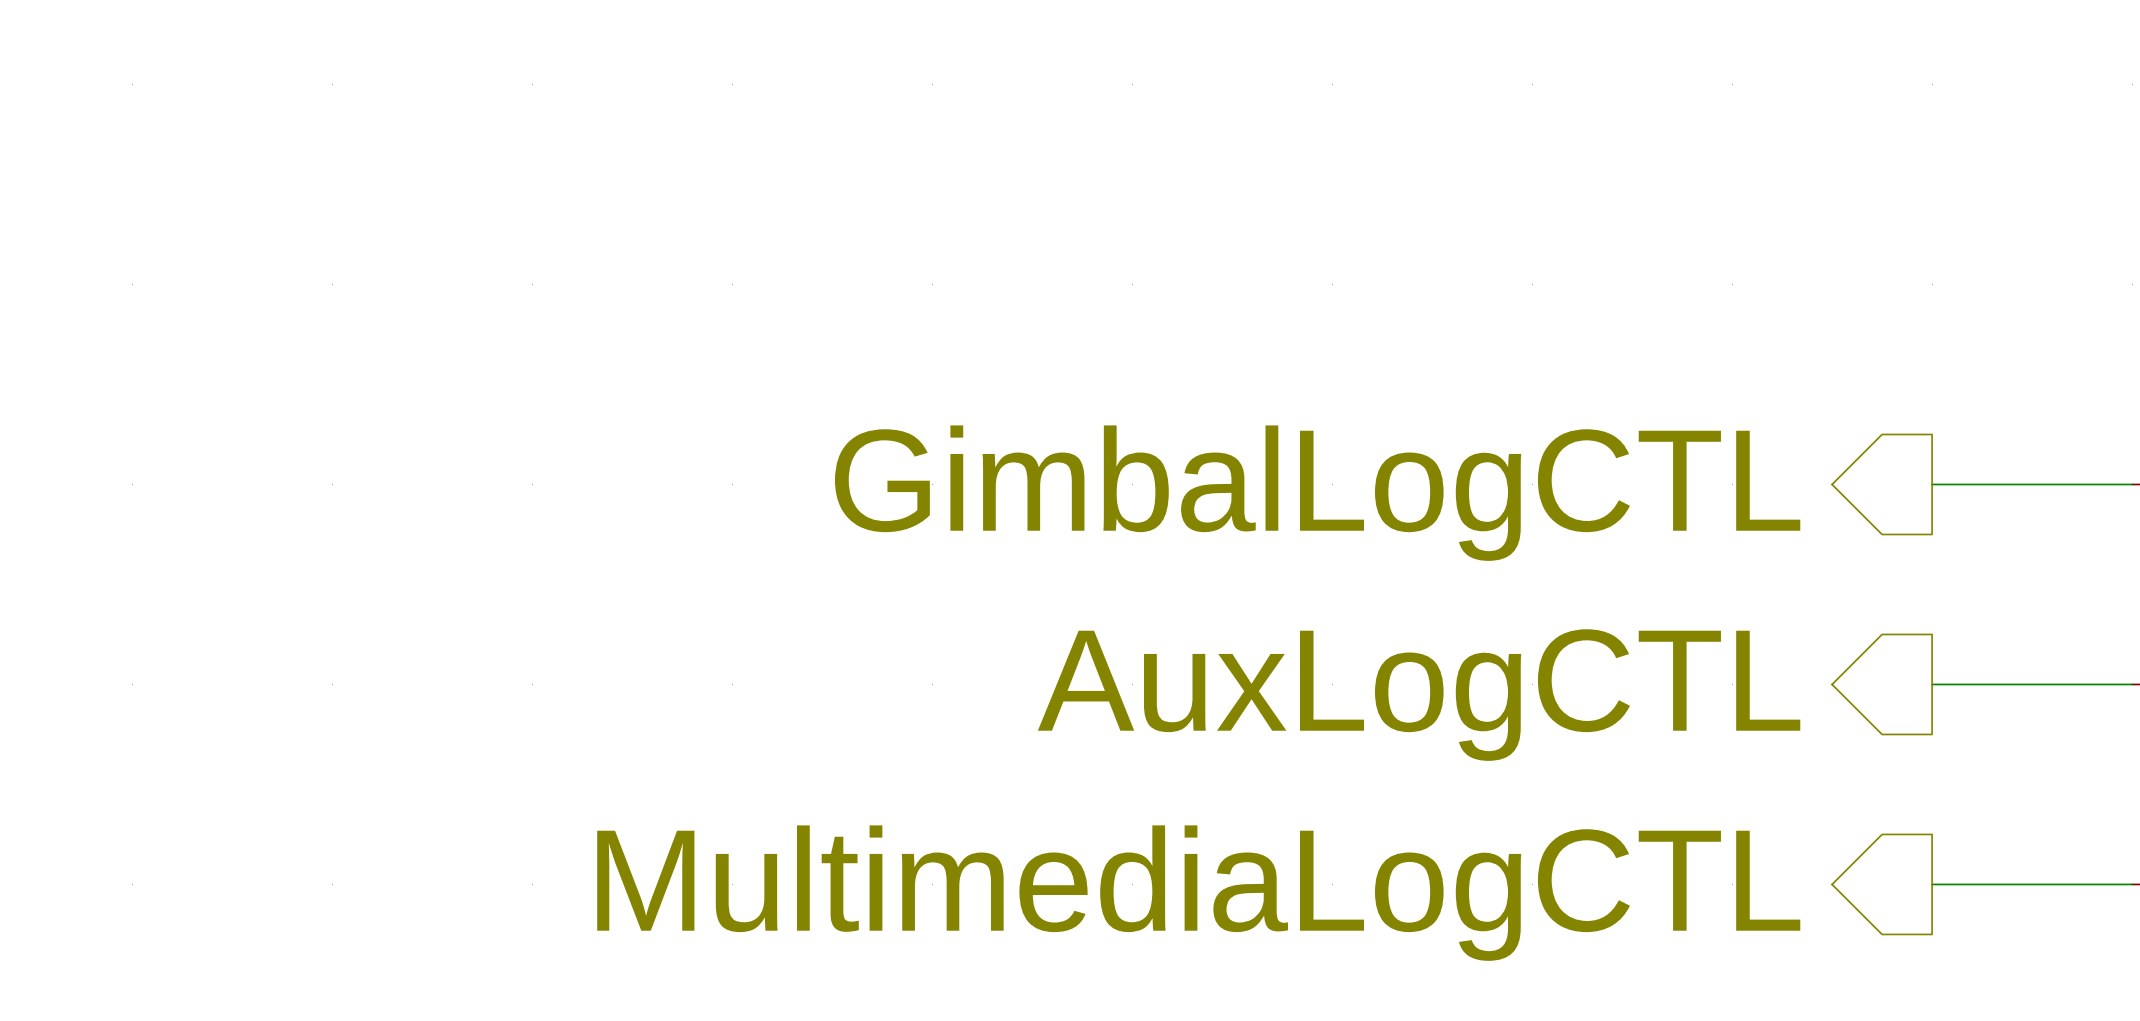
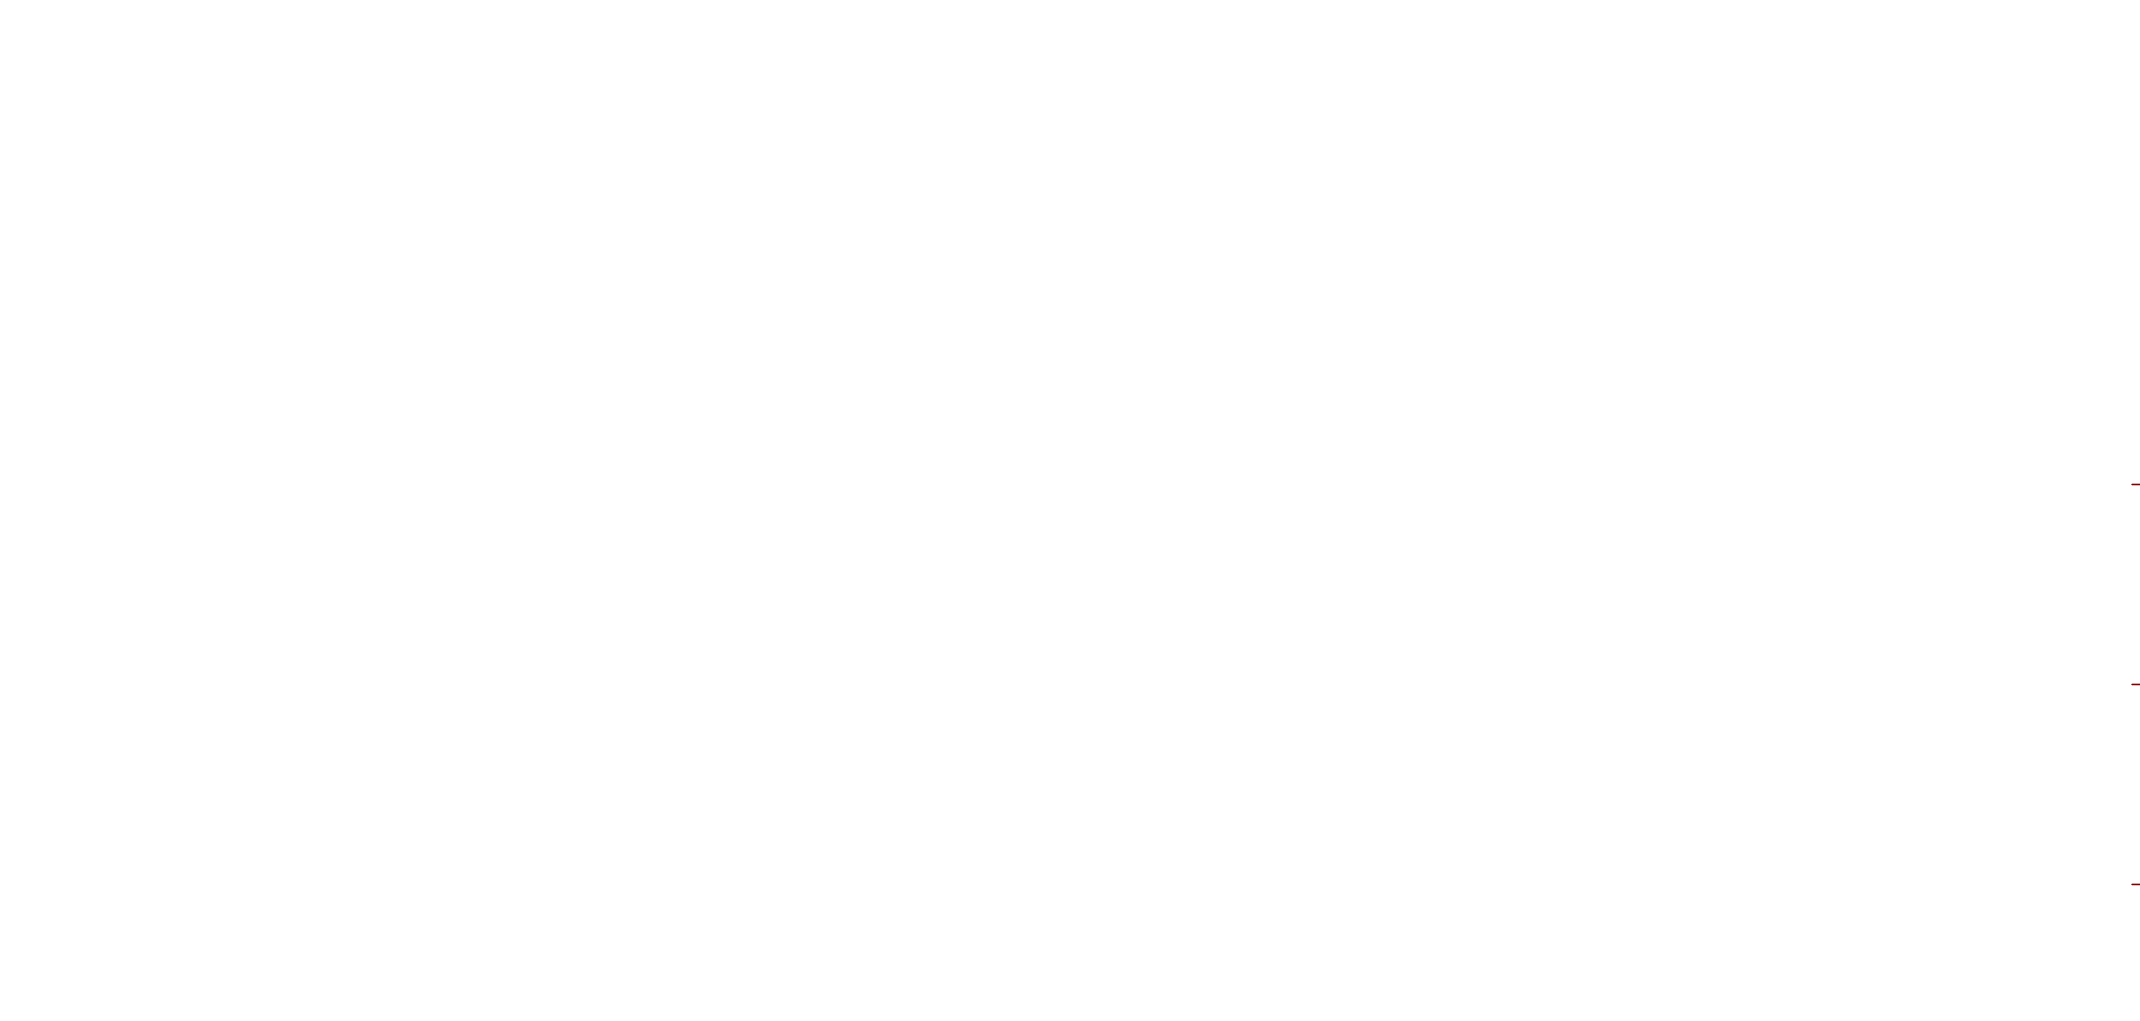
wire: (1932, 484) (2132, 484) -> none
hierarchical label: GimbalLogCTL (1317, 493) -> none
wire: (1932, 684) (2132, 684) -> none
hierarchical label: AuxLogCTL (1419, 695) -> none
wire: (1932, 884) (2132, 884) -> none
hierarchical label: MultimediaLogCTL (1198, 893) -> none

